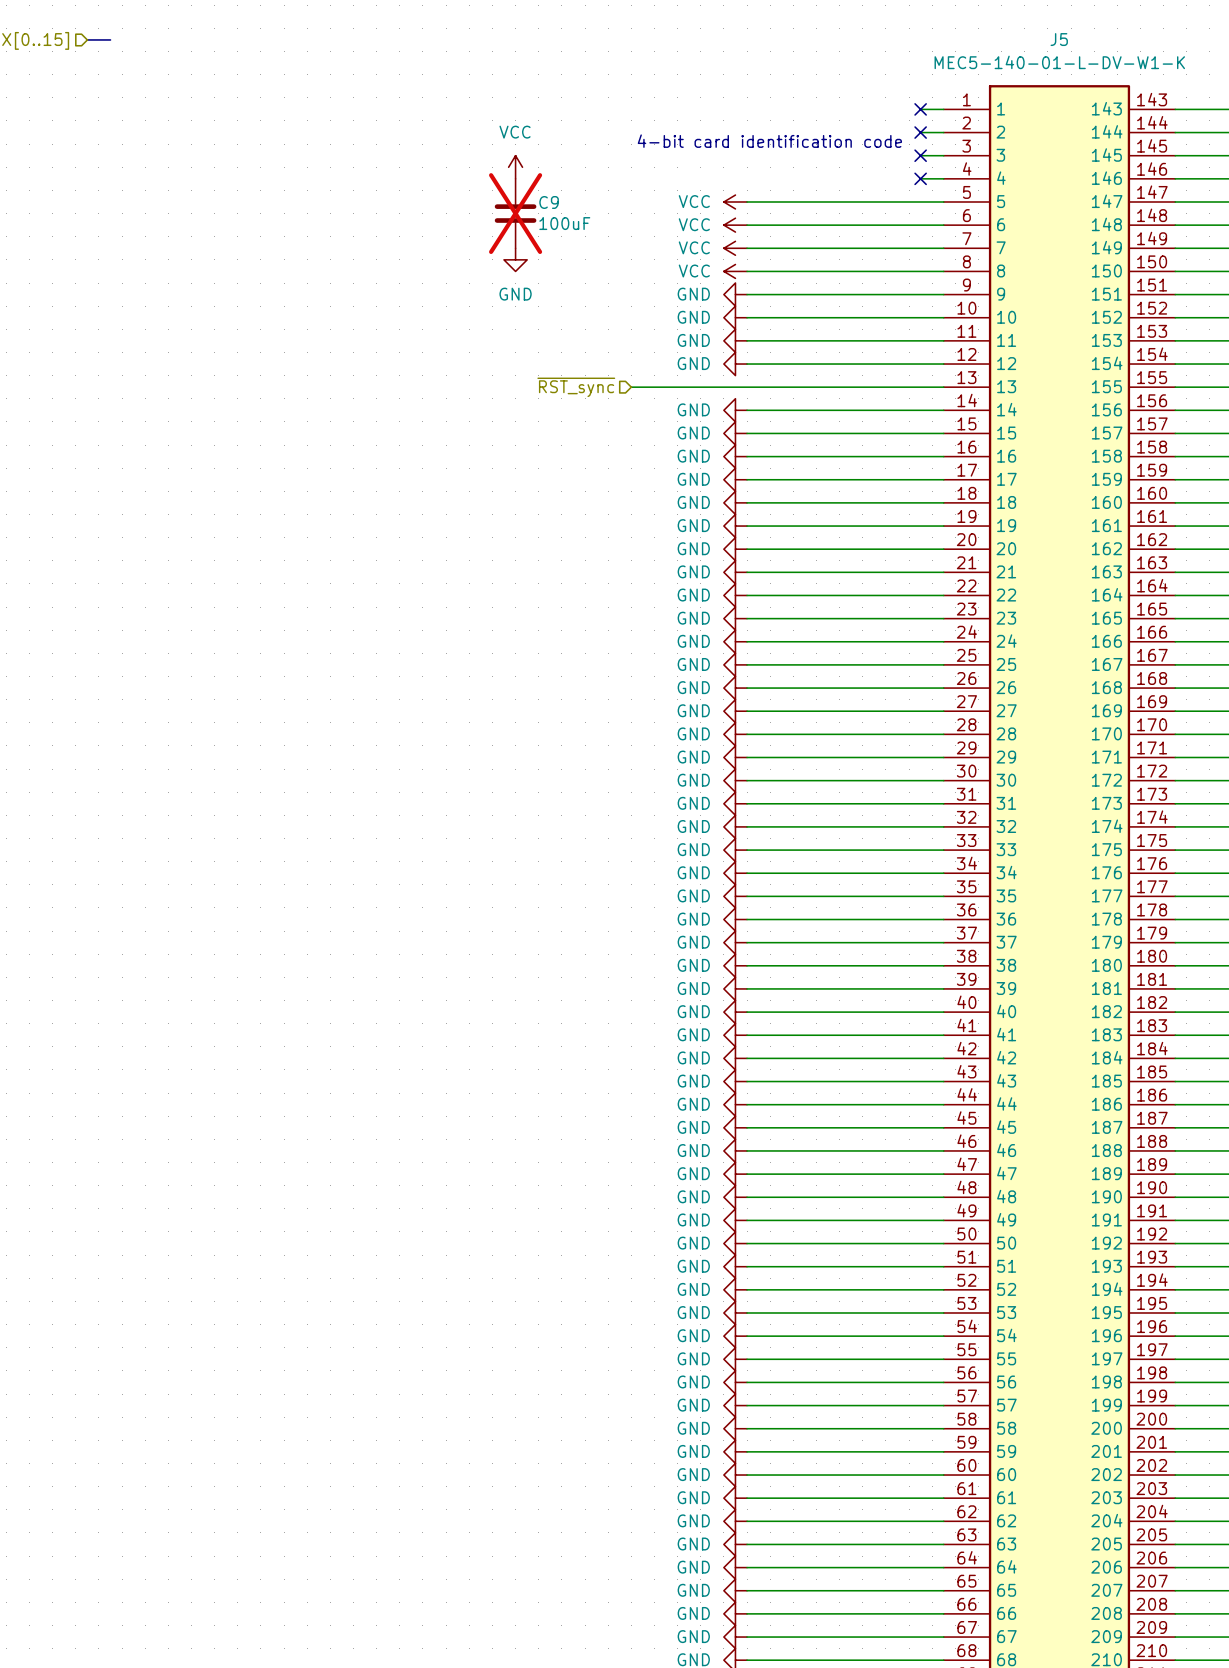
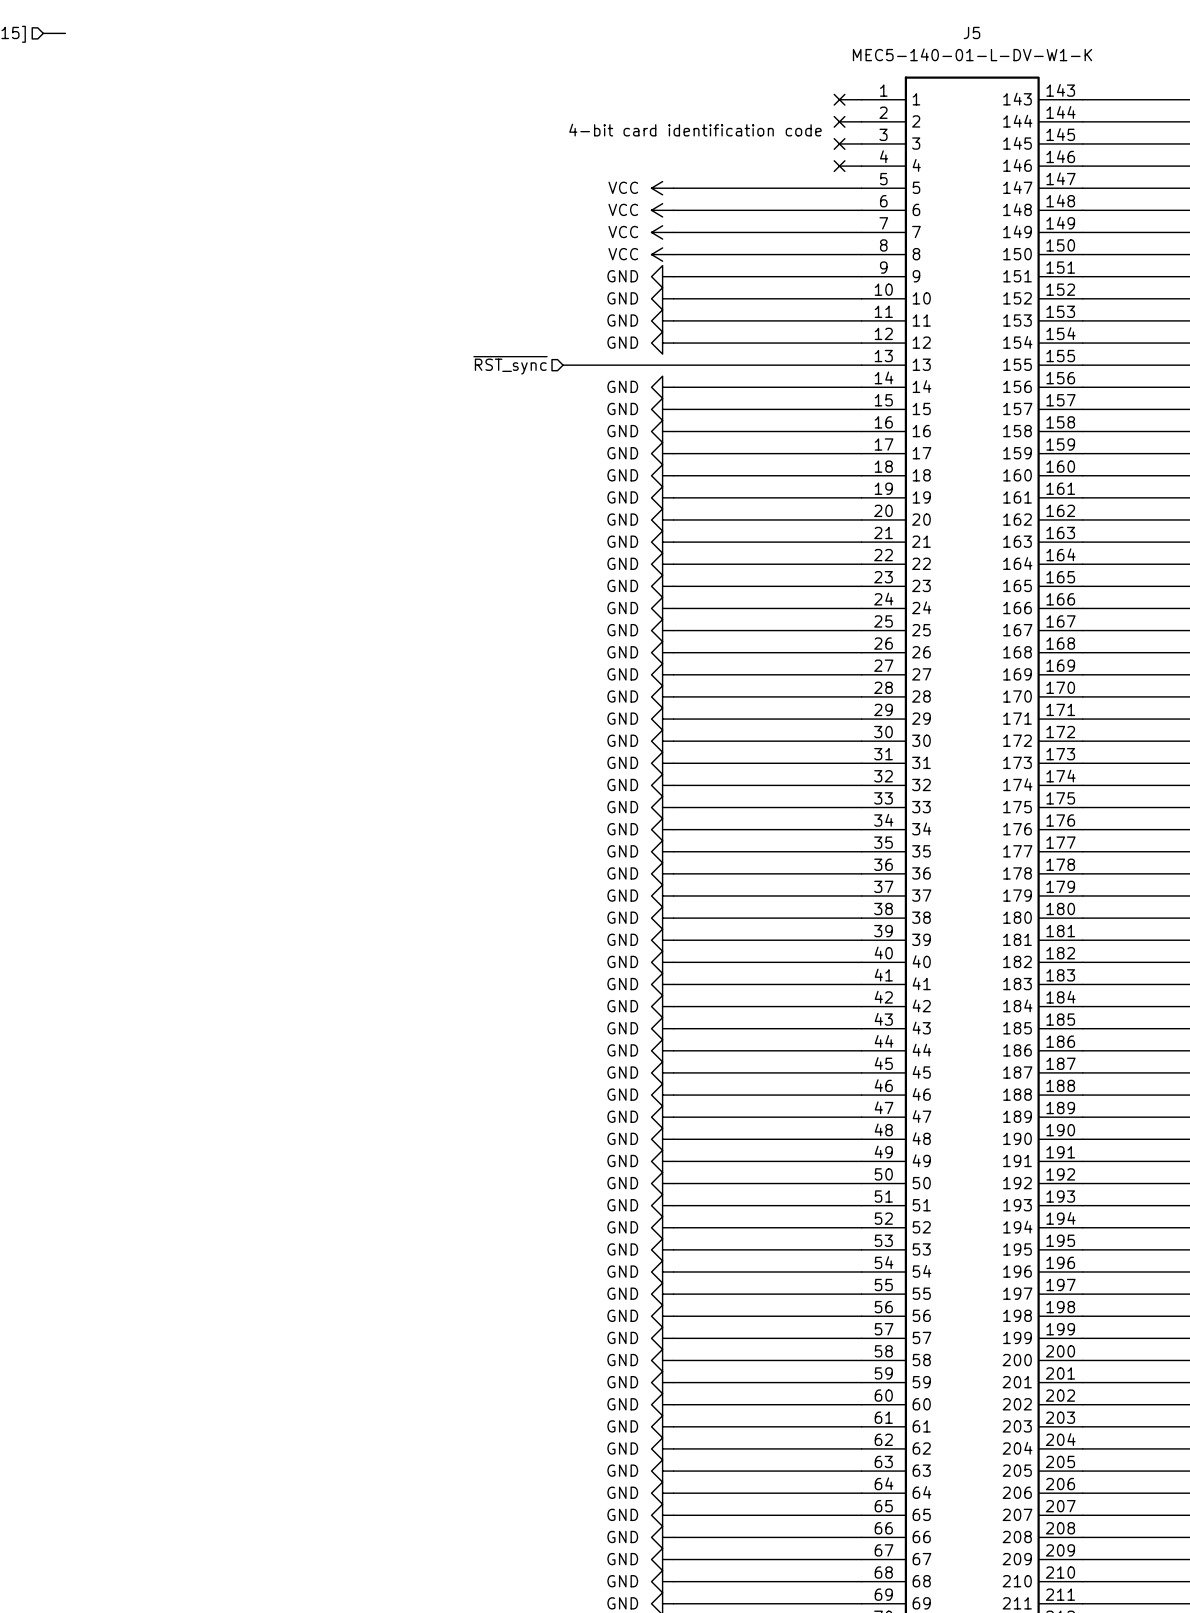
power symbol: VCC (515, 167) -> none
C9: 100uF (515, 213) -> none
power symbol: GND (515, 259) -> none

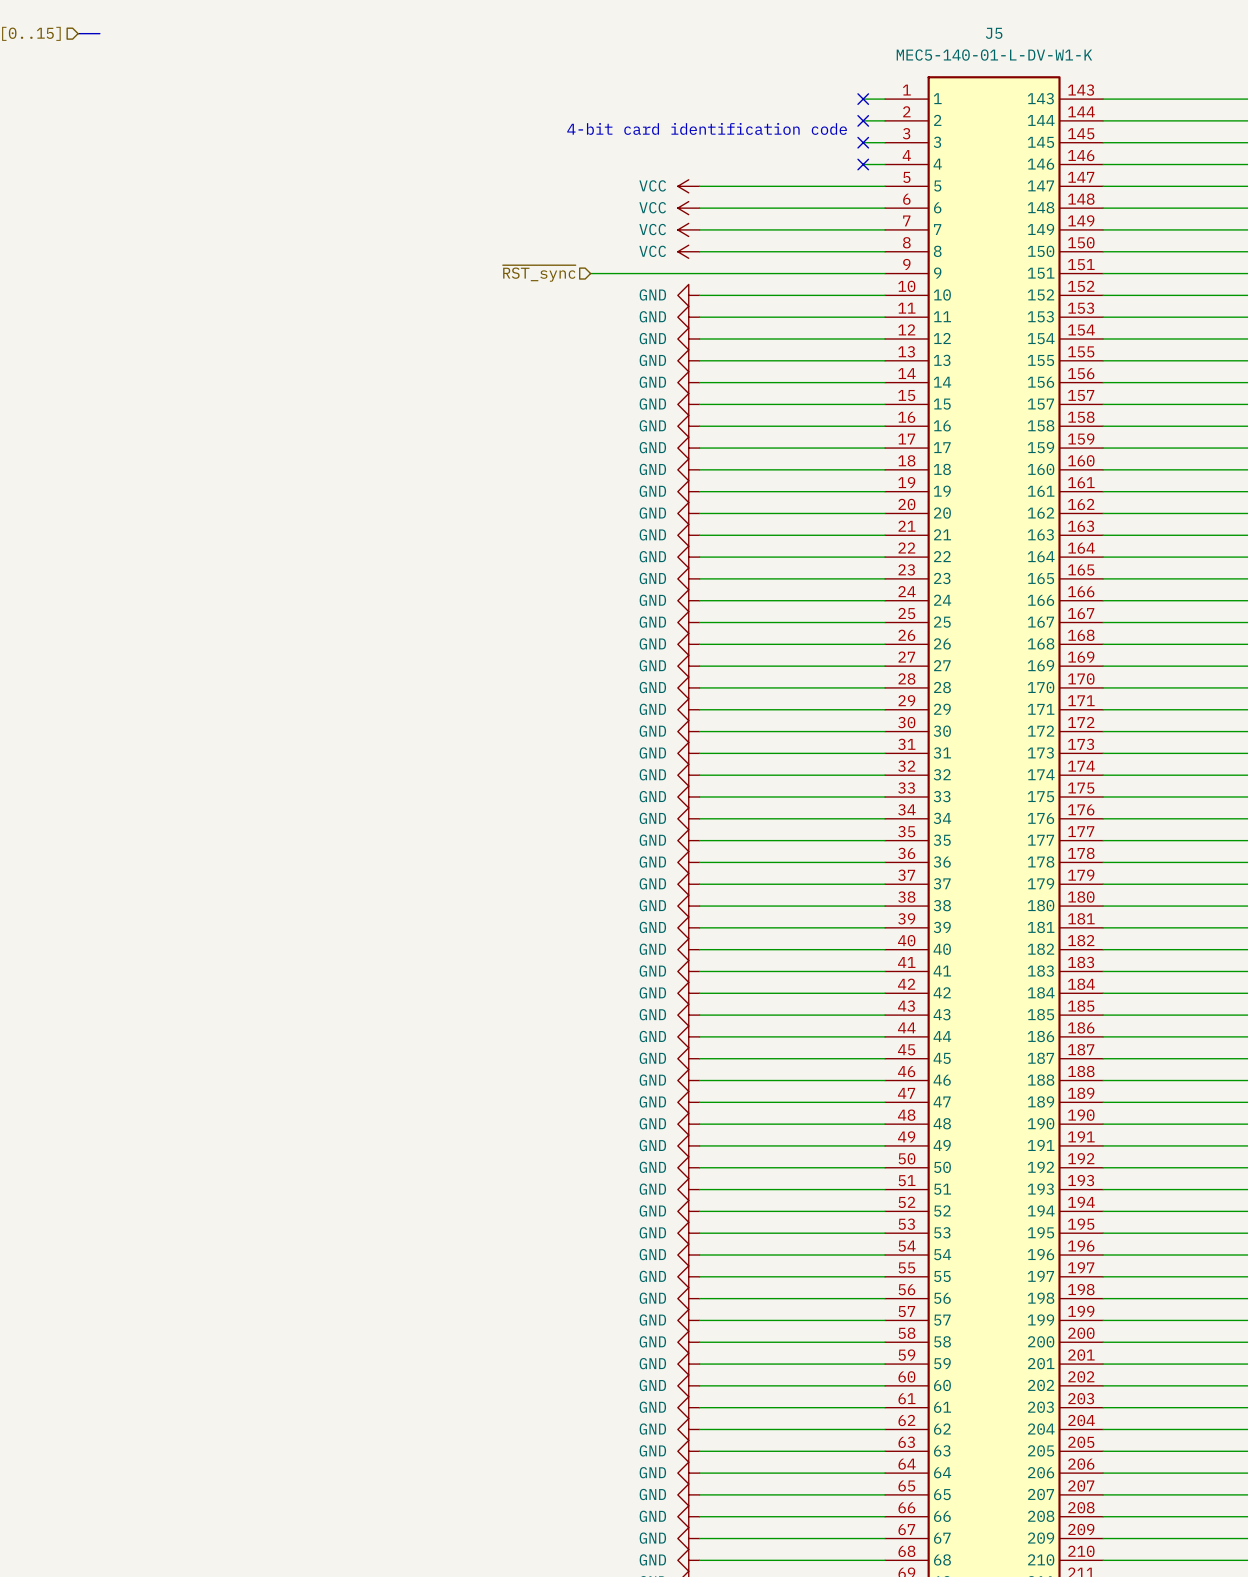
power symbol position: GND (662, 276) -> GND (688, 360)
hierarchical label position: ~{RST_sync} (510, 365) -> ~{RST_sync} (539, 273)
wire: (563, 365) (673, 365) -> (590, 273) (699, 273)

